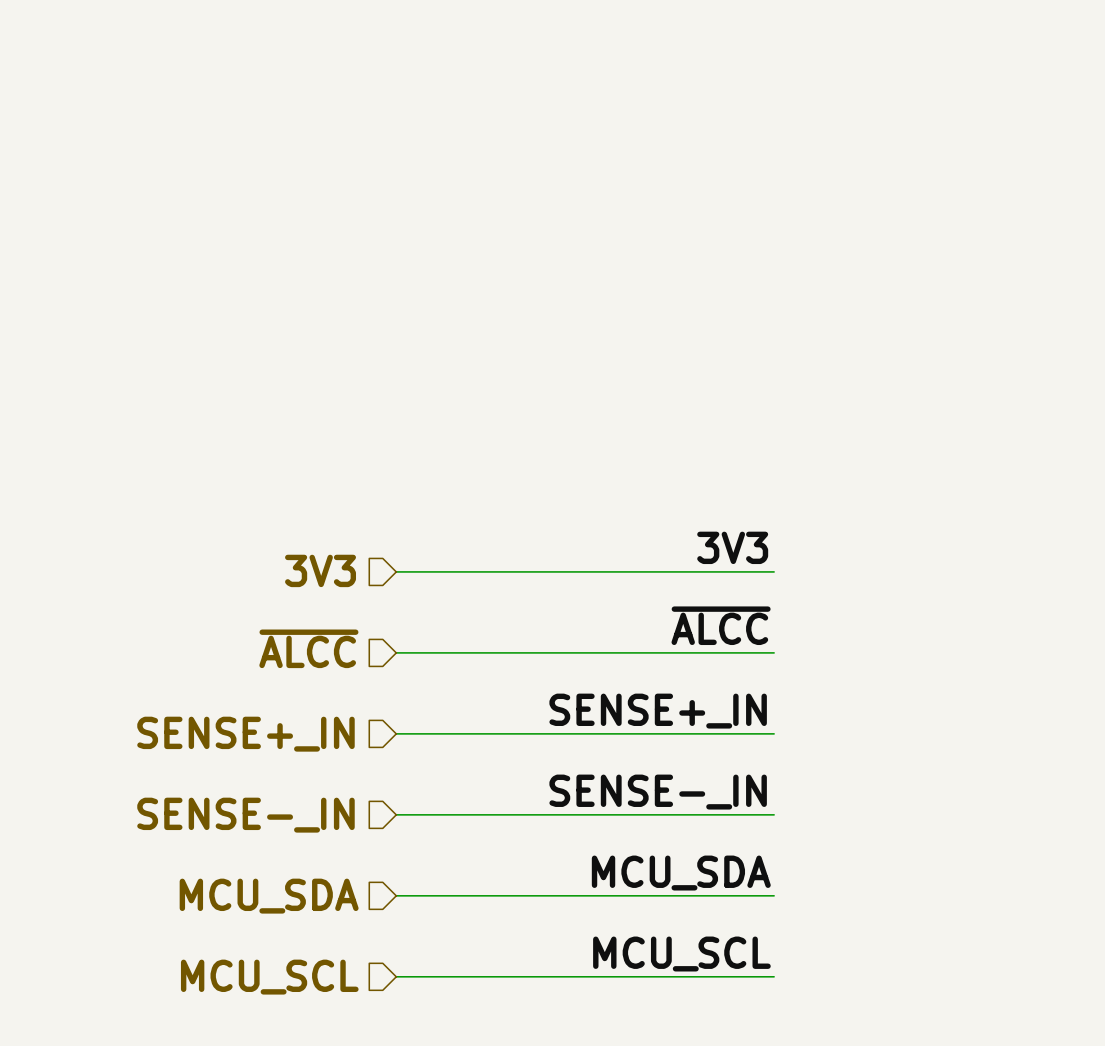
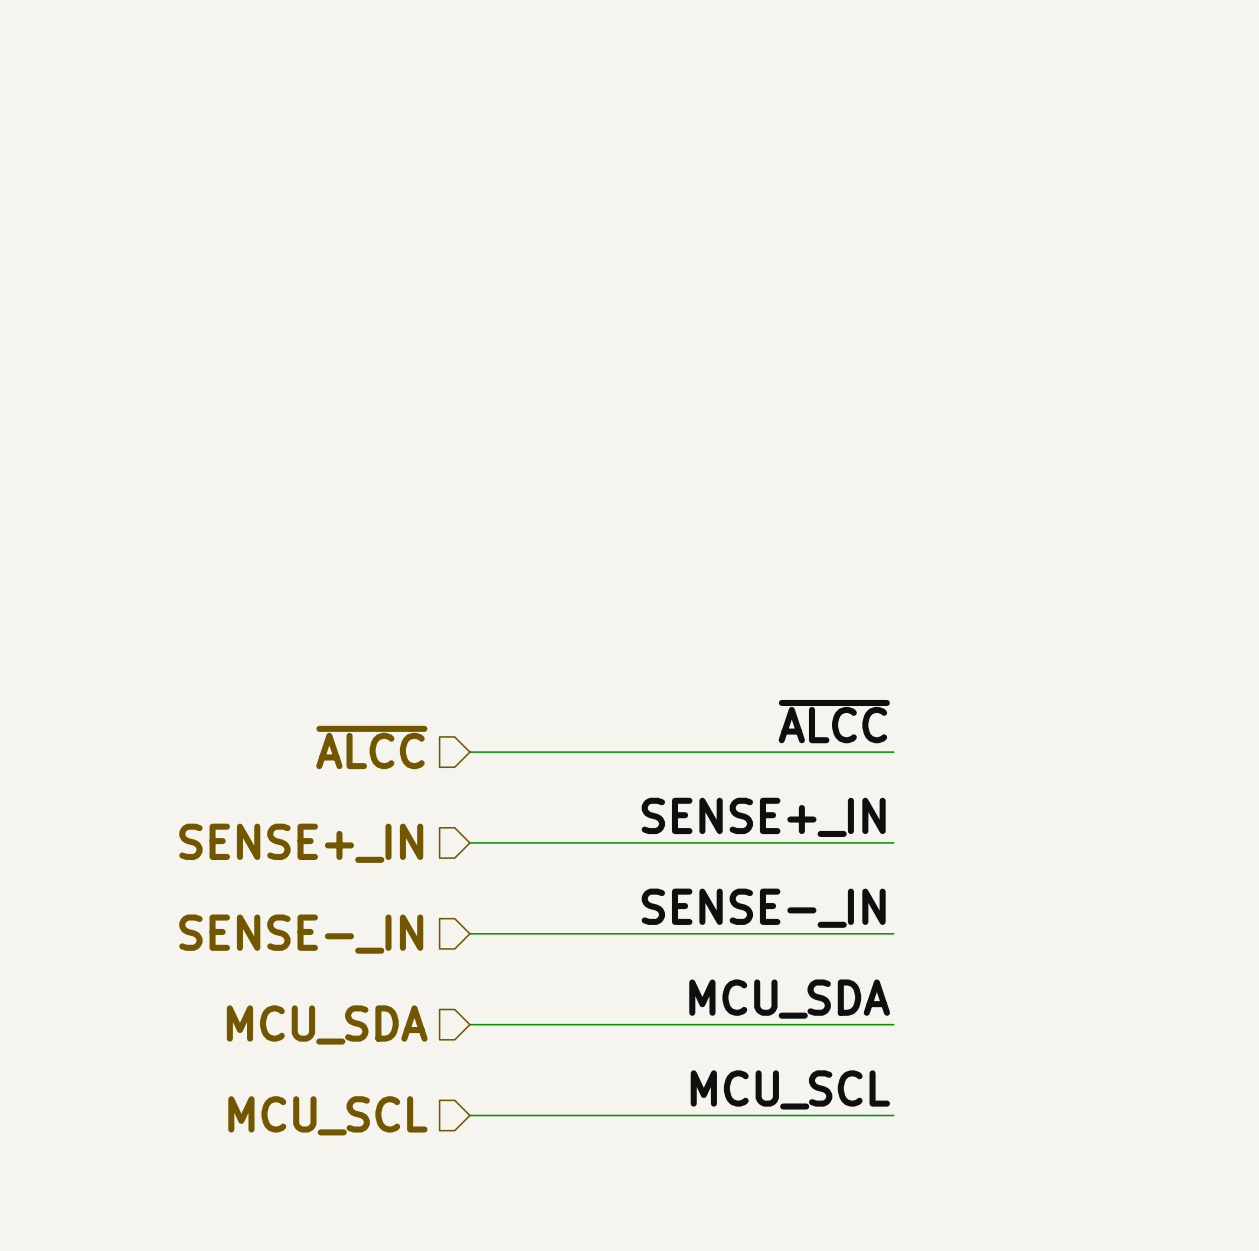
label: 3V3 (732, 547) -> none
hierarchical label: 3V3 (320, 570) -> none
wire: (396, 571) (774, 571) -> none

